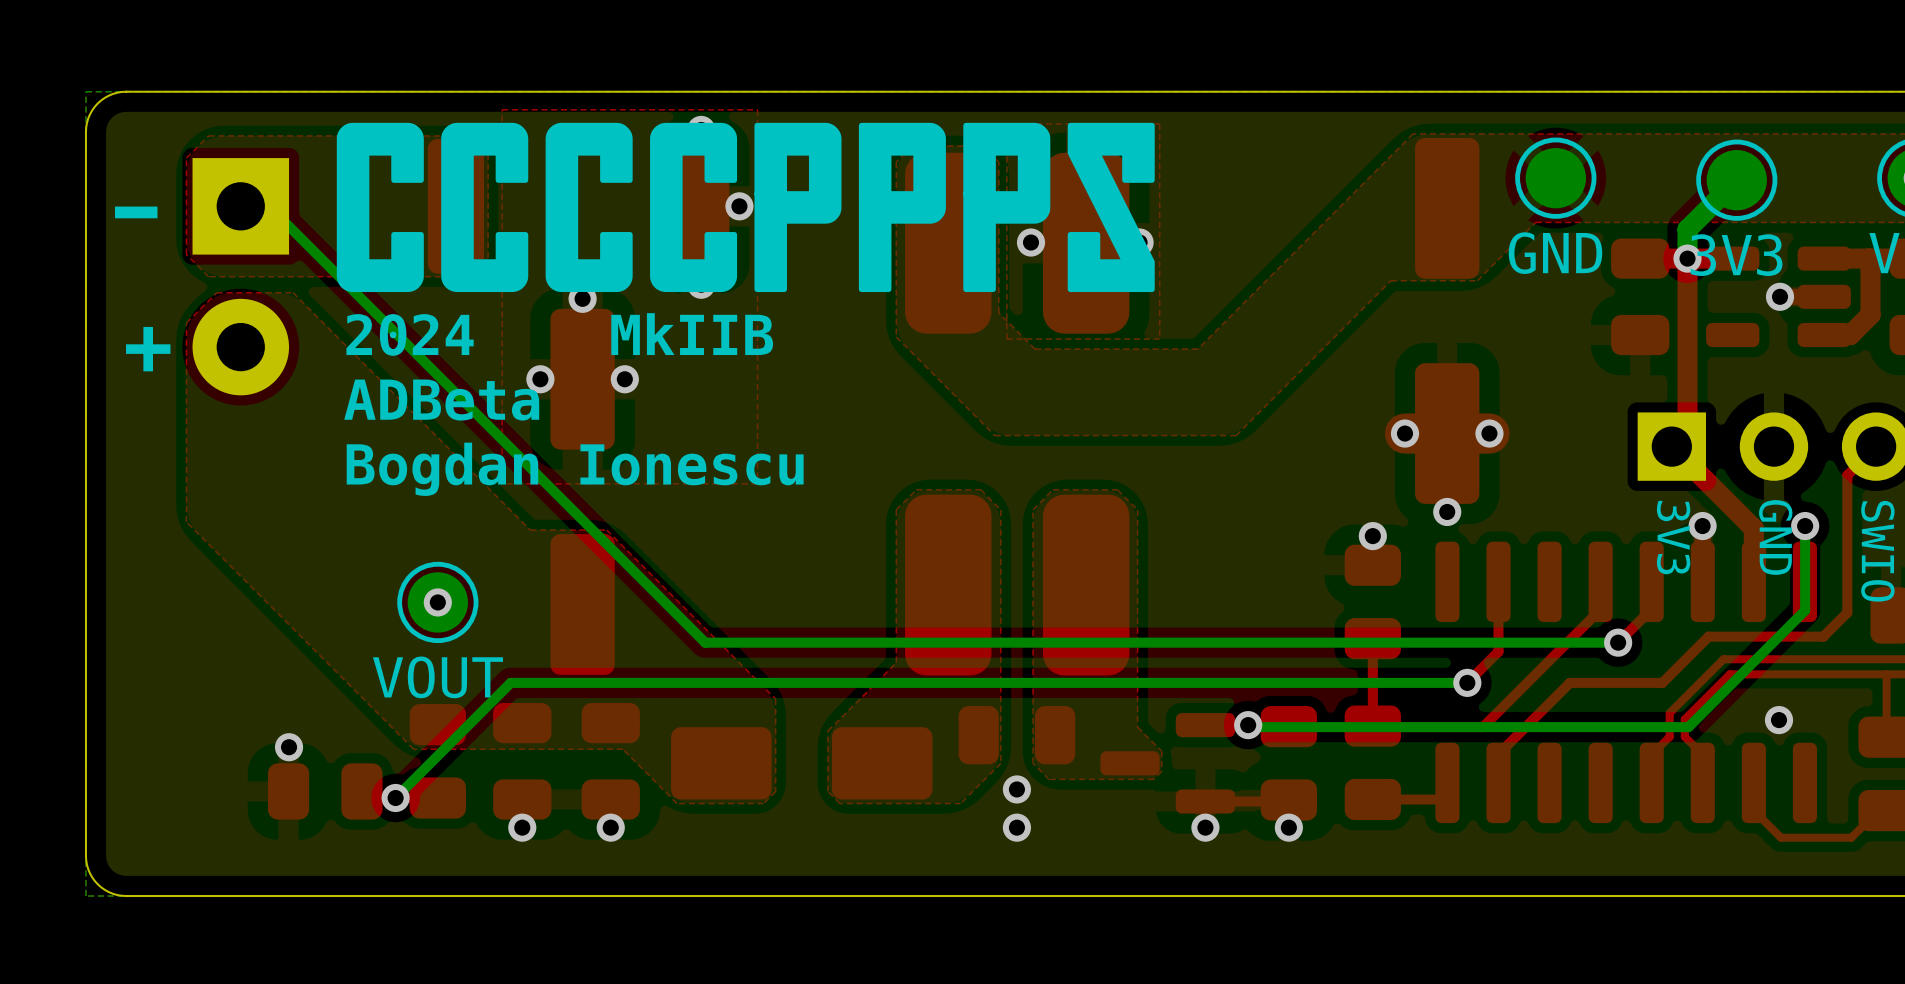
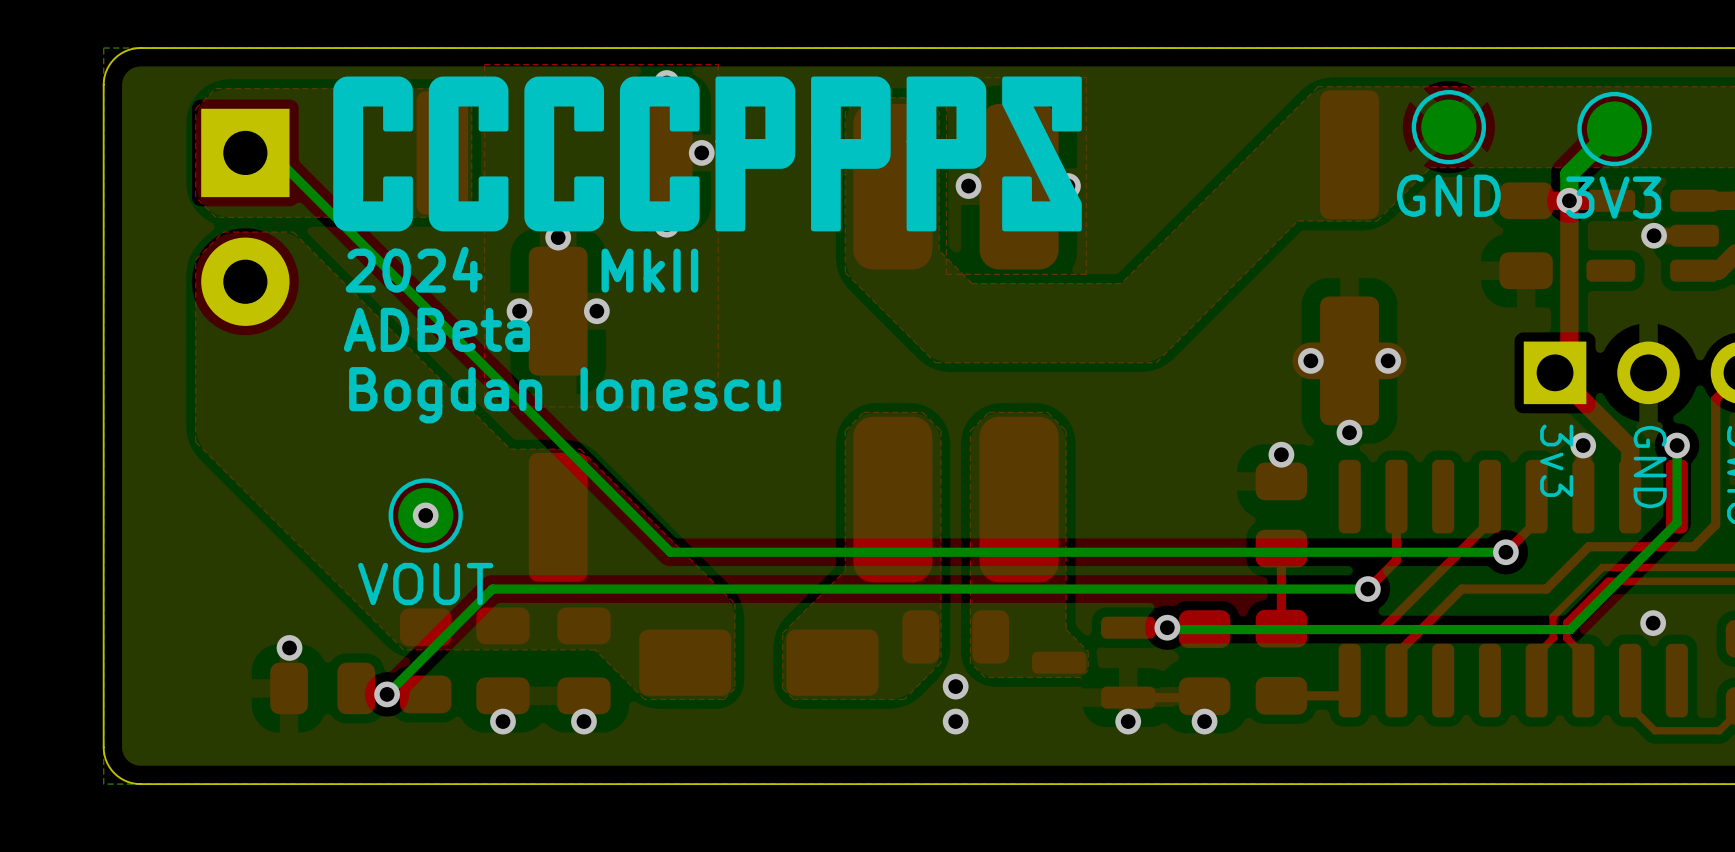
text: - (136, 212) -> none
text: 2024 MkIIB (559, 334) -> 2024 MkII (521, 269)
text: + (148, 349) -> none
text: 3V3 (1673, 537) -> 3v3 (1556, 460)

